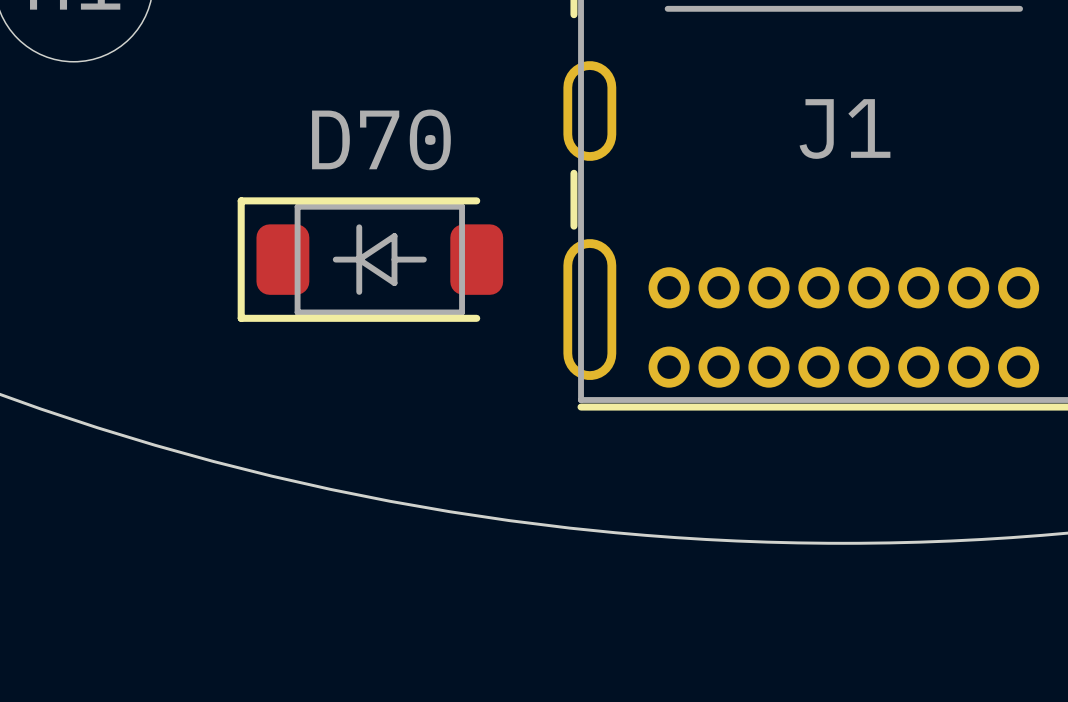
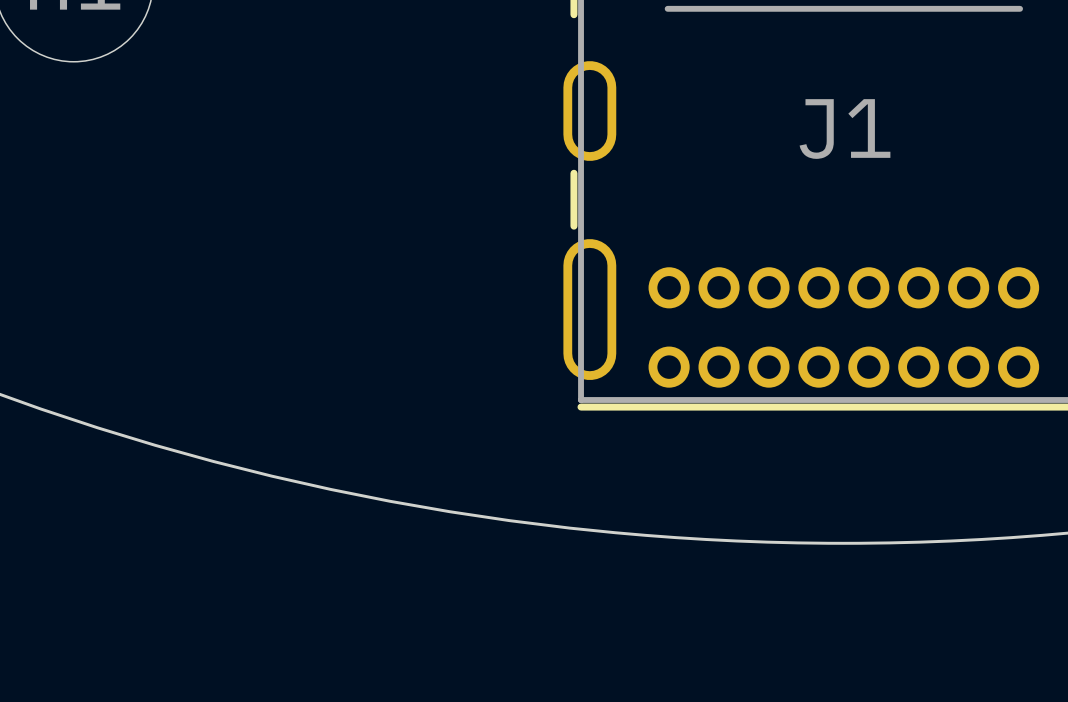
D70: (370, 259) -> none

